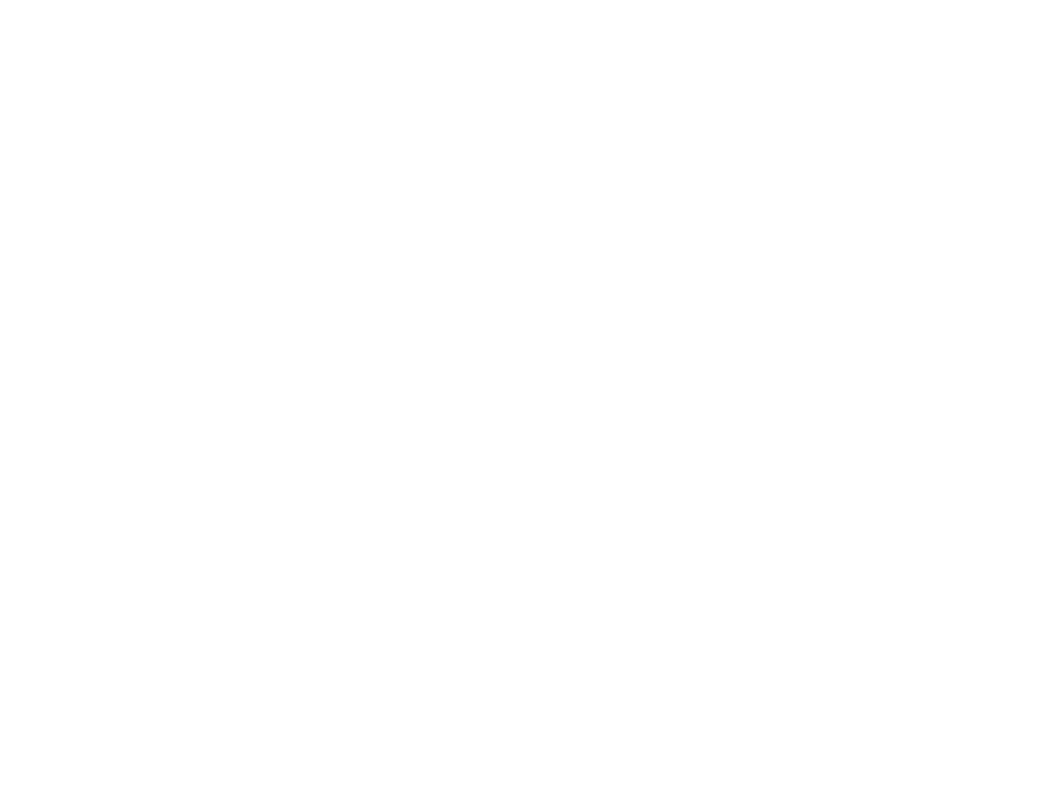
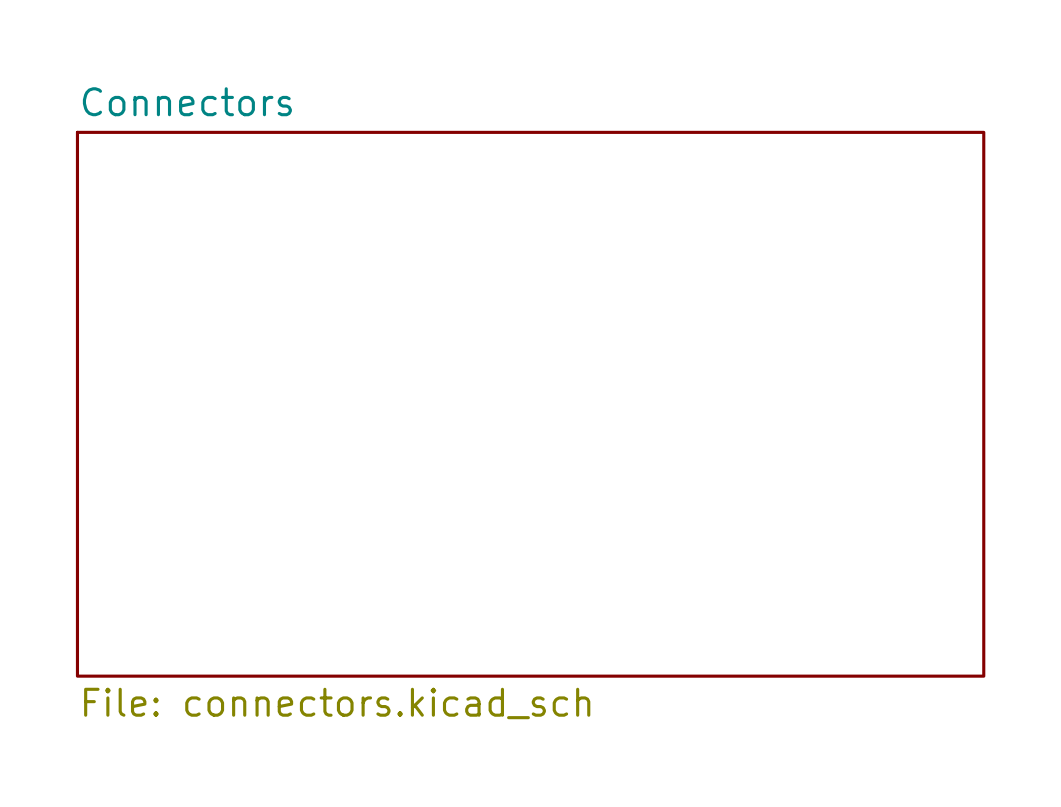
sheet Connectors: none -> File: connectors.kicad_sch (530, 404)

